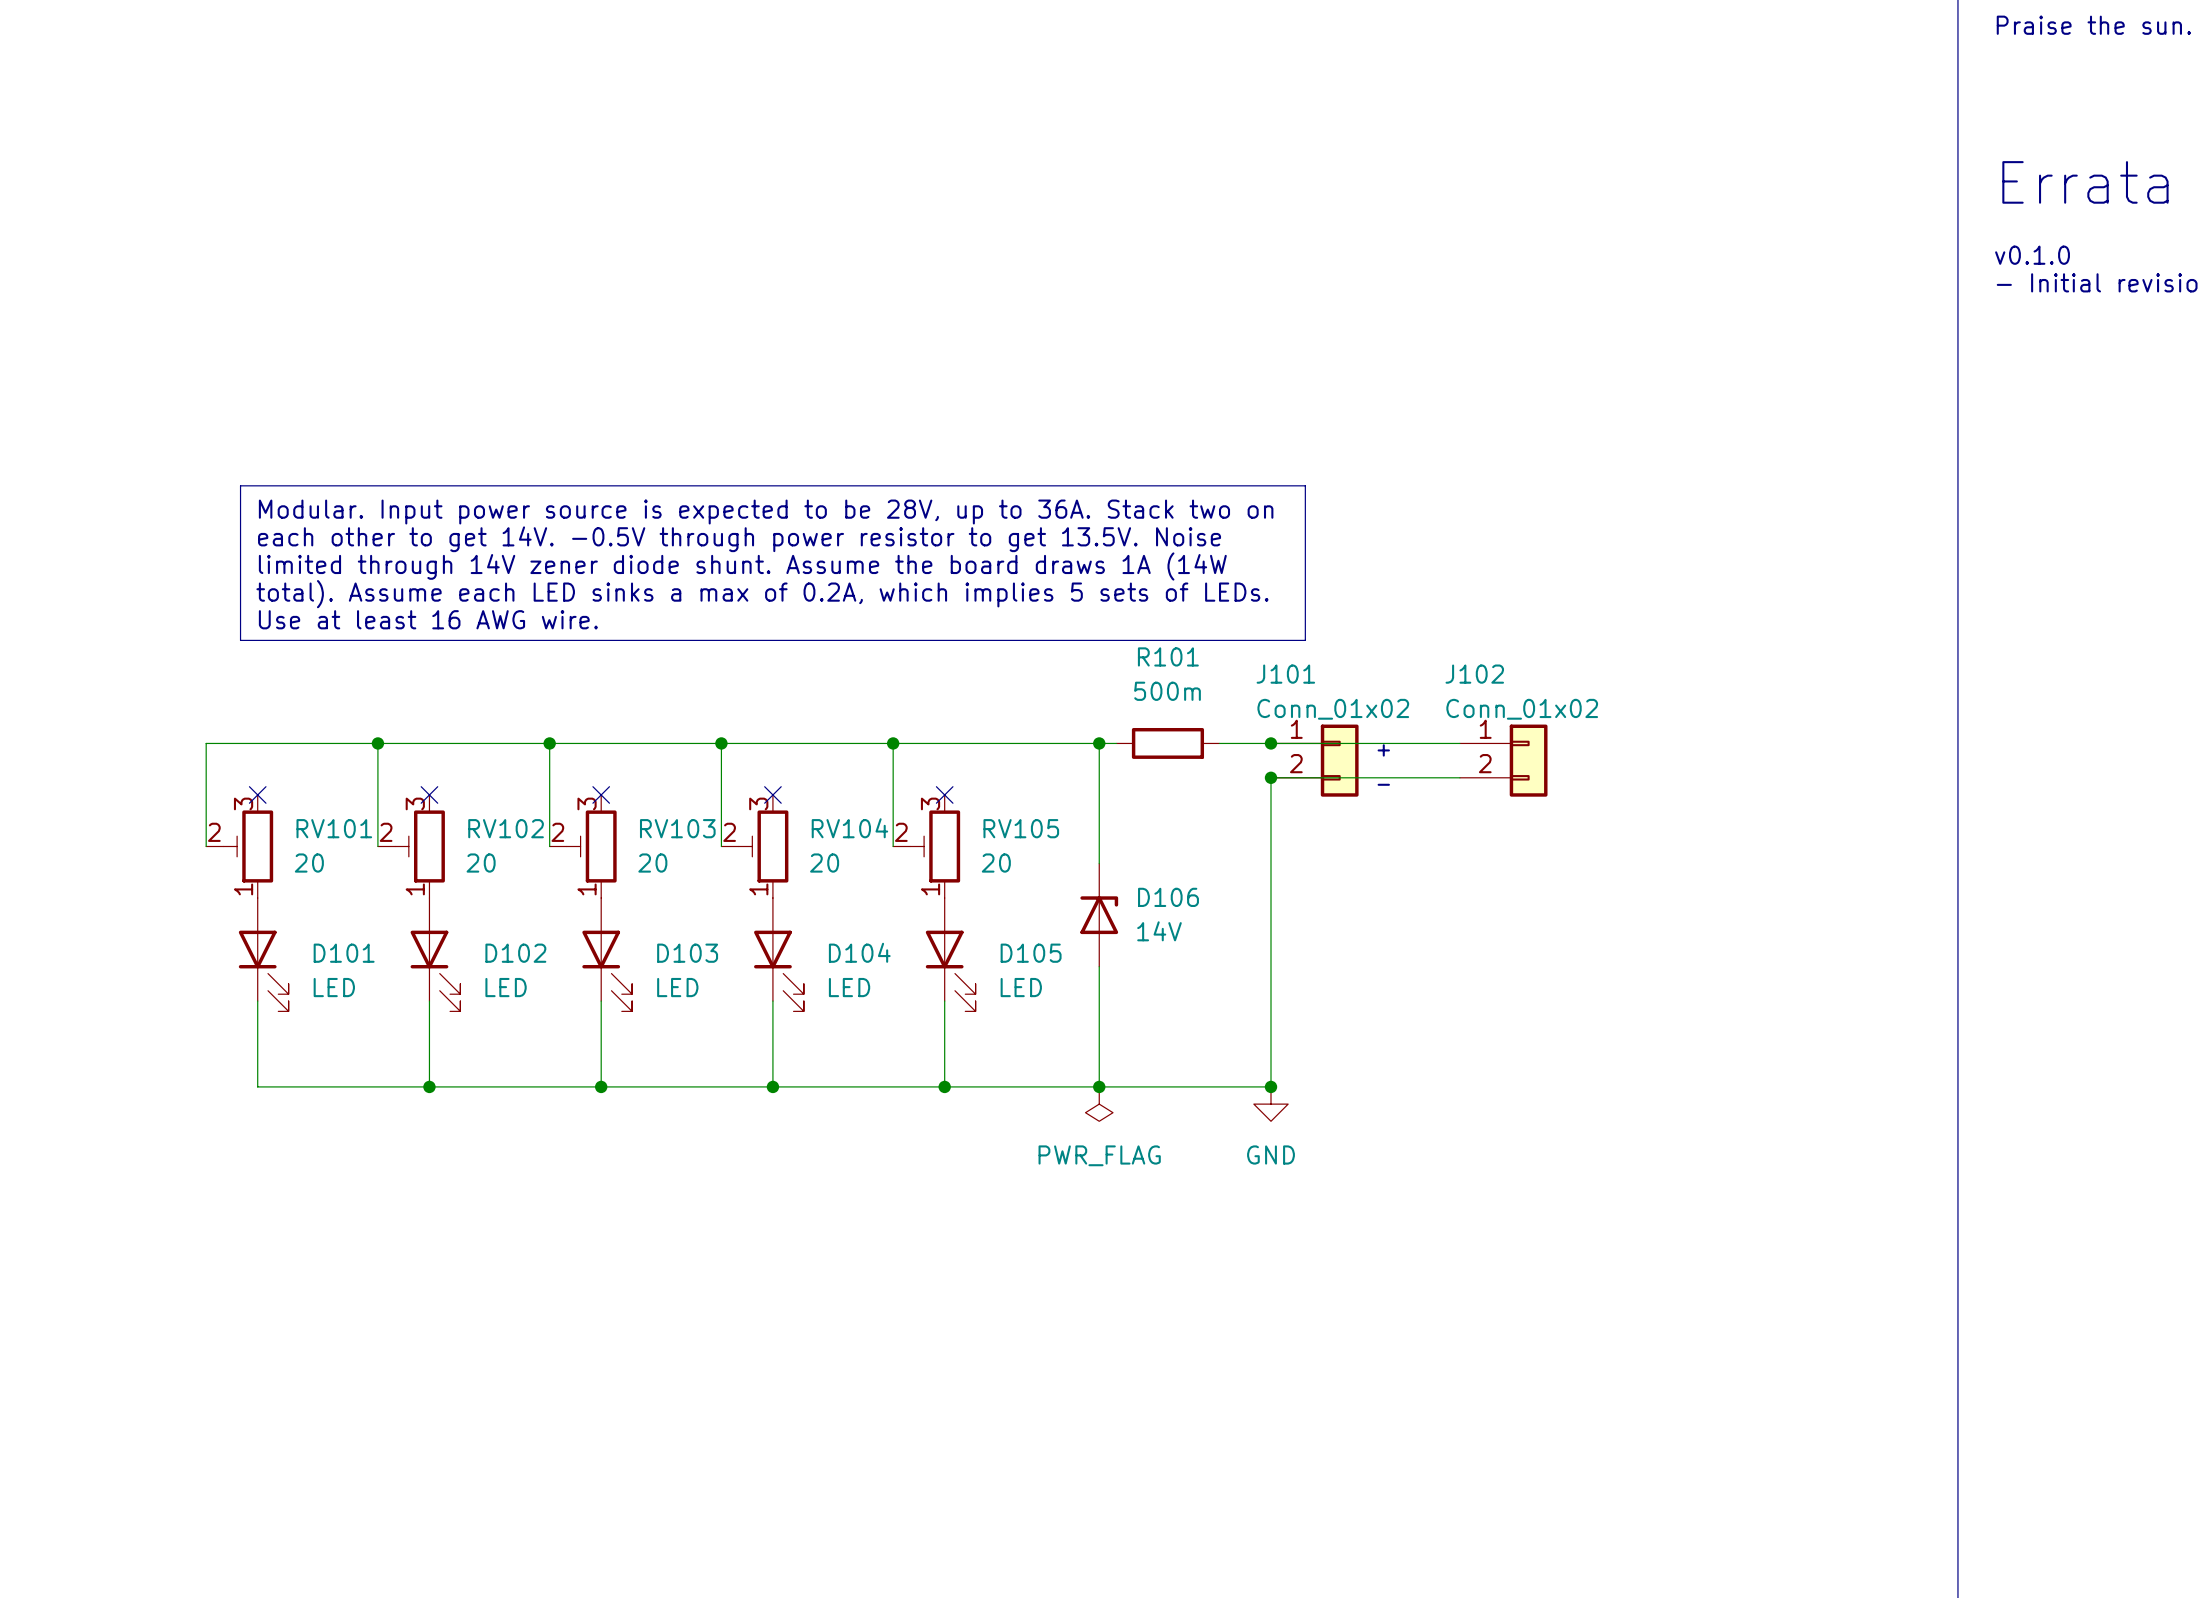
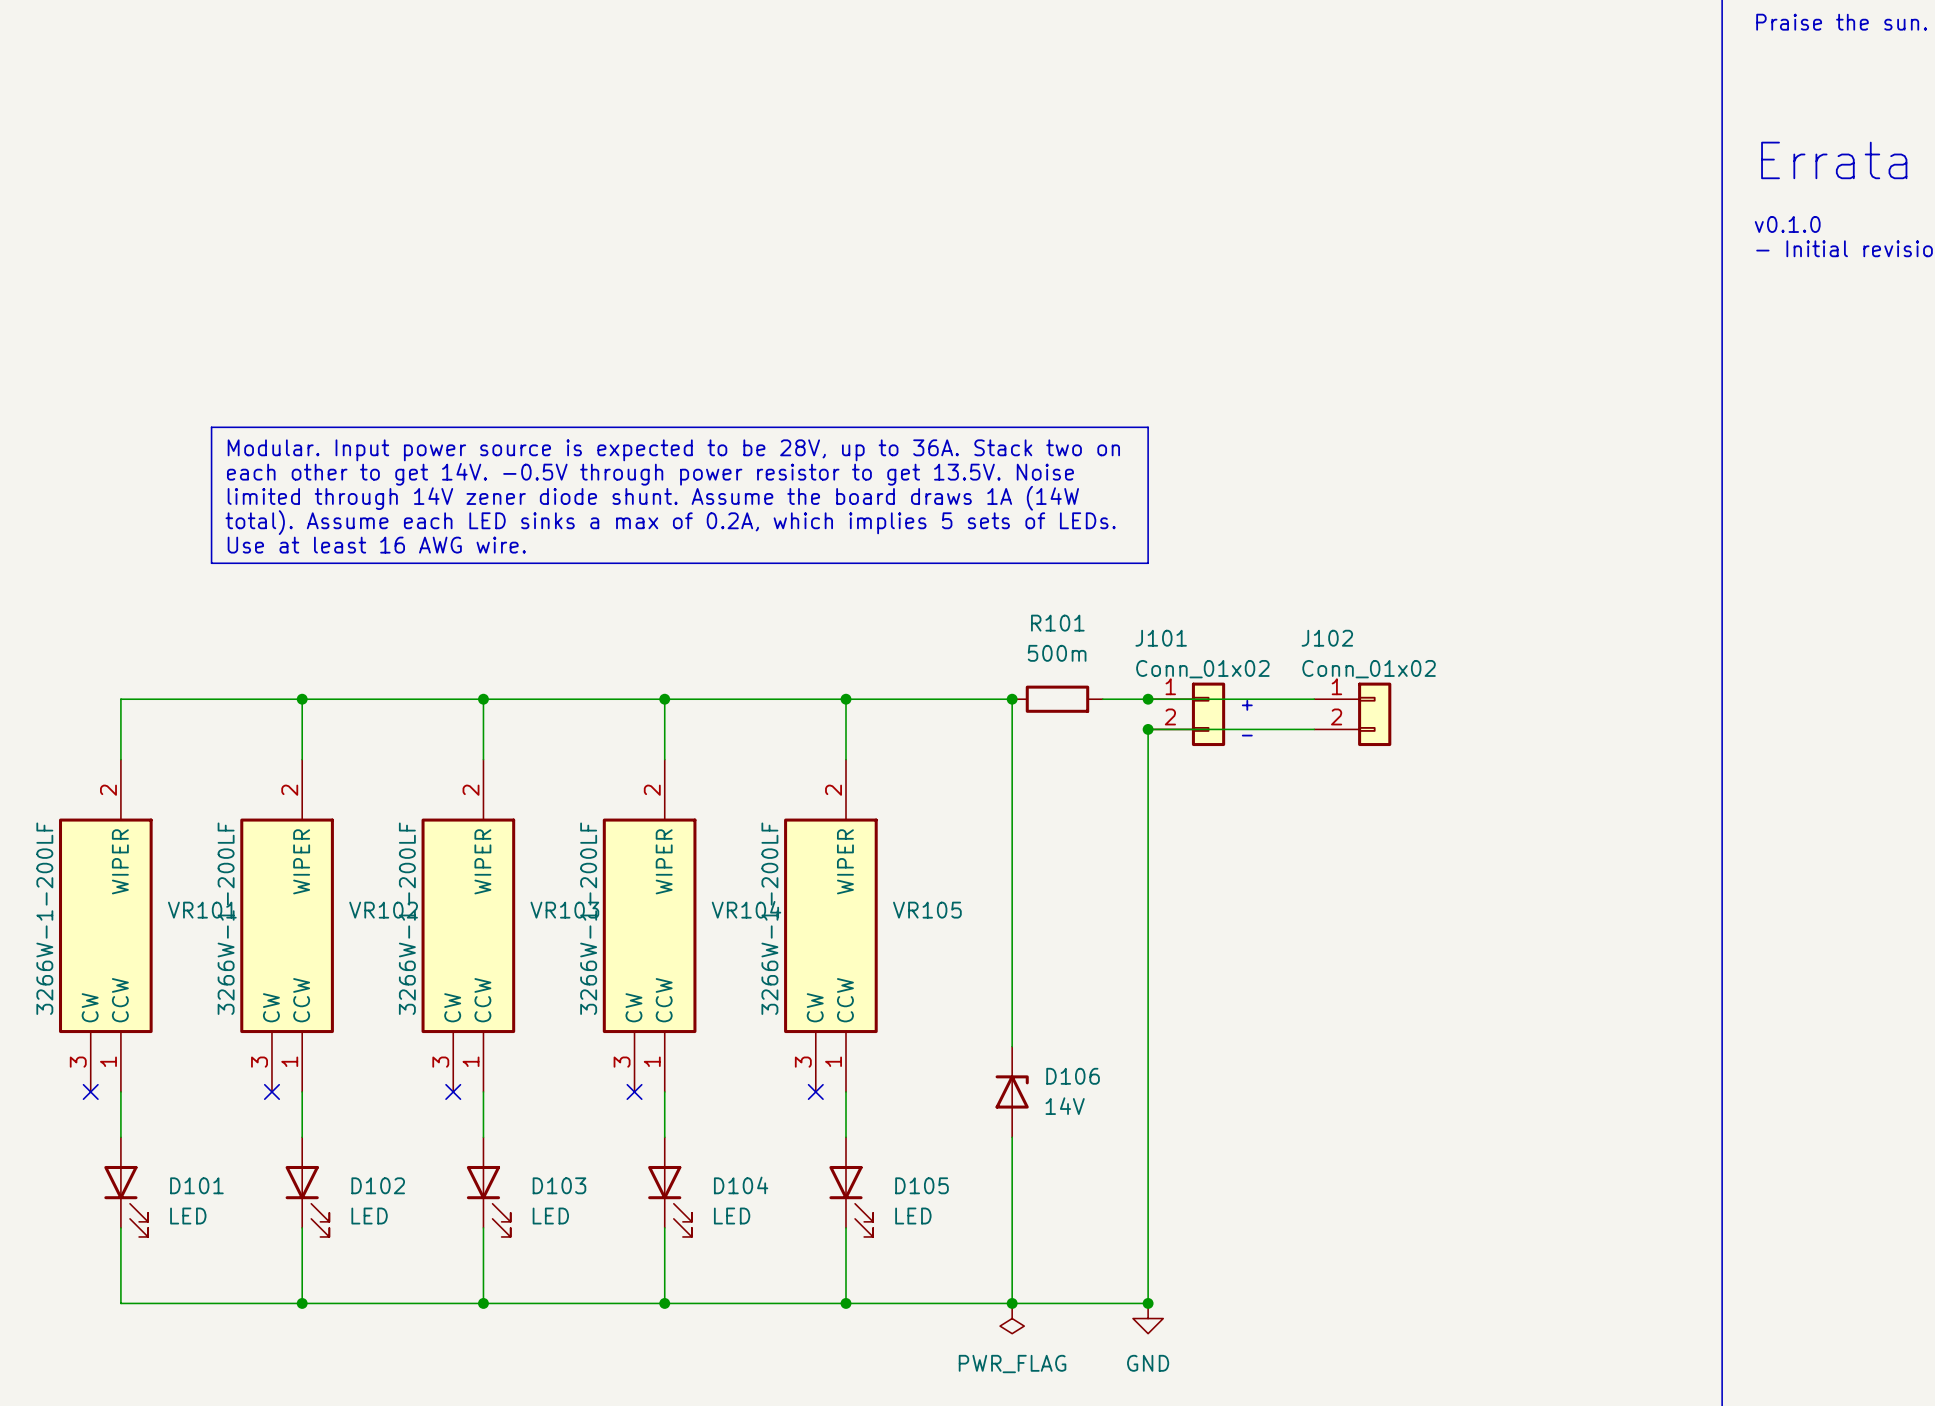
wire: (377, 743) (377, 846) -> none
junction position: (377, 743) -> (302, 699)
wire: (549, 743) (549, 794) -> none
junction position: (549, 743) -> (483, 699)
wire: (721, 743) (721, 846) -> none
junction position: (721, 743) -> (664, 699)
wire: (893, 743) (893, 846) -> none
junction: (893, 743) -> none
wire: (1099, 743) (1099, 863) -> none
junction: (1099, 743) -> none
wire: (1116, 743) (206, 743) (206, 846) -> none
R101 position: (1167, 743) -> (1057, 699)
wire: (1219, 743) (1459, 743) -> (1102, 699) (1314, 699)
junction: (1271, 743) -> none
text position: + (1383, 750) -> + (1247, 705)
J101 position: (1314, 760) -> (1186, 714)
J102 position: (1503, 760) -> (1352, 714)
junction: (1271, 777) -> none
wire: (1459, 777) (1271, 777) (1271, 1086) (257, 1086) (257, 1001) -> none
text position: - (1383, 784) -> - (1247, 735)
no-connect mark: (257, 794) -> none
wire: none -> (302, 699) (302, 759)
no-connect mark: (429, 794) -> none
no-connect mark: (601, 794) -> none
wire: none -> (664, 699) (664, 759)
no-connect mark: (772, 794) -> none
no-connect mark: (944, 794) -> none
wire: none -> (846, 699) (846, 759)
junction: none -> (846, 699)
junction: none -> (1012, 699)
junction: none -> (1148, 699)
junction: none -> (1148, 729)
wire: none -> (1314, 729) (1148, 729) (1148, 1303) (120, 1303) (120, 1227)
RV101: 20 (239, 846) -> none
RV102: 20 (411, 846) -> none
wire: none -> (483, 744) (483, 759)
RV103: 20 (583, 846) -> none
RV104: 20 (754, 846) -> none
RV105: 20 (926, 846) -> none
wire: none -> (120, 759) (120, 699) (1012, 699) (1012, 1046)
D106 position: (1099, 915) -> (1012, 1091)
D101 position: (263, 954) -> (126, 1187)
D102 position: (435, 954) -> (307, 1187)
D103 position: (607, 954) -> (488, 1187)
D104 position: (778, 954) -> (670, 1187)
D105 position: (950, 954) -> (851, 1187)
wire: (1099, 966) (1099, 1086) -> none
wire: (429, 1001) (429, 1086) -> none
wire: (601, 1001) (601, 1086) -> none
VR101: none -> 3266W-1-200LF (105, 925)
VR102: none -> 3266W-1-200LF (287, 925)
VR103: none -> 3266W-1-200LF (468, 925)
VR104: none -> 3266W-1-200LF (649, 925)
VR105: none -> 3266W-1-200LF (830, 925)
junction: (429, 1086) -> none
junction: (601, 1086) -> none
junction: (772, 1086) -> none
junction: (944, 1086) -> none
junction: (1099, 1086) -> none
junction: (1271, 1086) -> none
power symbol: PWR_FLAG (1099, 1104) -> none
power symbol: GND (1271, 1104) -> none
no-connect mark: none -> (90, 1091)
wire: none -> (120, 1091) (120, 1137)
no-connect mark: none -> (271, 1091)
wire: none -> (302, 1091) (302, 1137)
no-connect mark: none -> (453, 1091)
wire: none -> (483, 1091) (483, 1137)
no-connect mark: none -> (634, 1091)
wire: none -> (664, 1091) (664, 1137)
no-connect mark: none -> (815, 1091)
wire: none -> (846, 1091) (846, 1137)
wire: none -> (1012, 1137) (1012, 1303)
wire: none -> (302, 1227) (302, 1303)
wire: none -> (483, 1227) (483, 1303)
wire: none -> (664, 1227) (664, 1303)
wire: none -> (846, 1227) (846, 1303)
junction: none -> (302, 1303)
junction: none -> (483, 1303)
junction: none -> (664, 1303)
junction: none -> (846, 1303)
junction: none -> (1012, 1303)
junction: none -> (1148, 1303)
power symbol: none -> PWR_FLAG (1012, 1318)
power symbol: none -> GND (1148, 1318)

